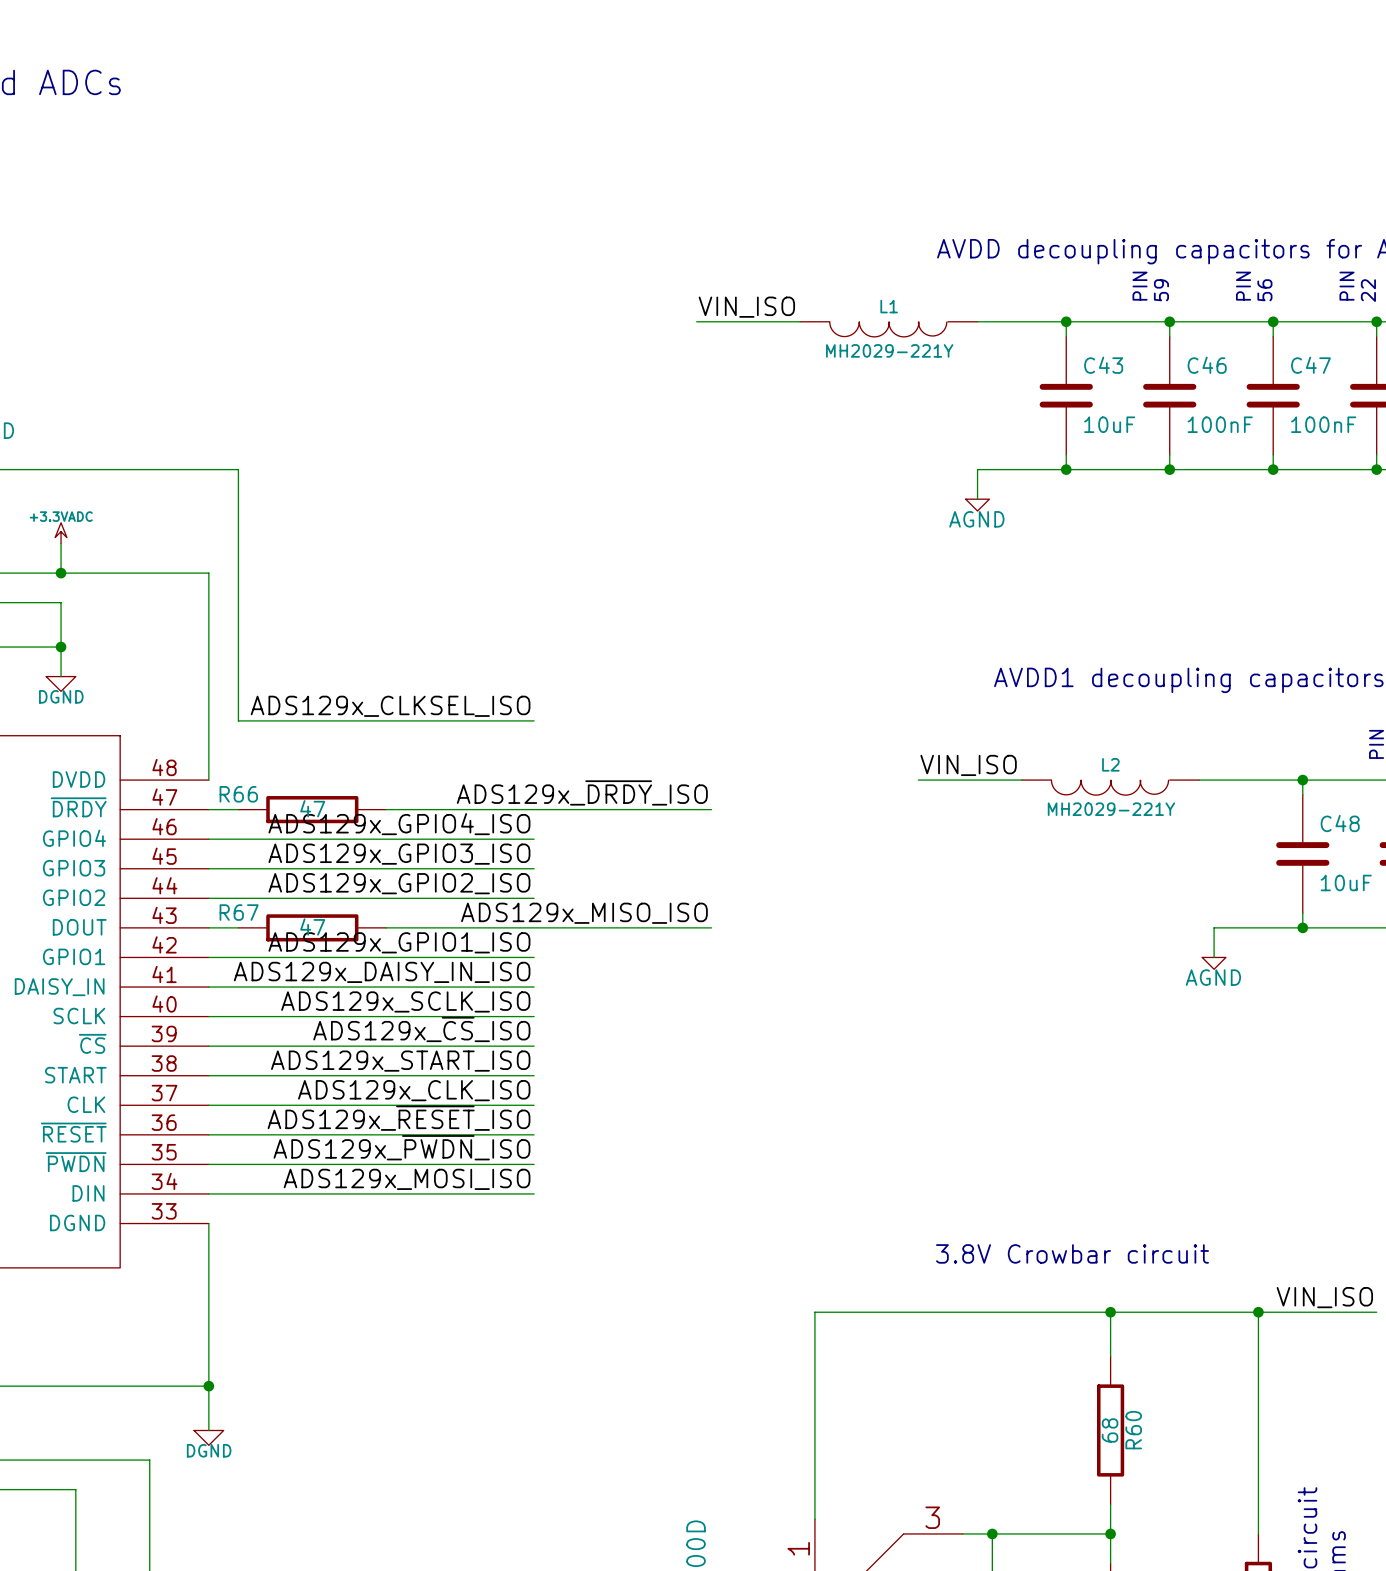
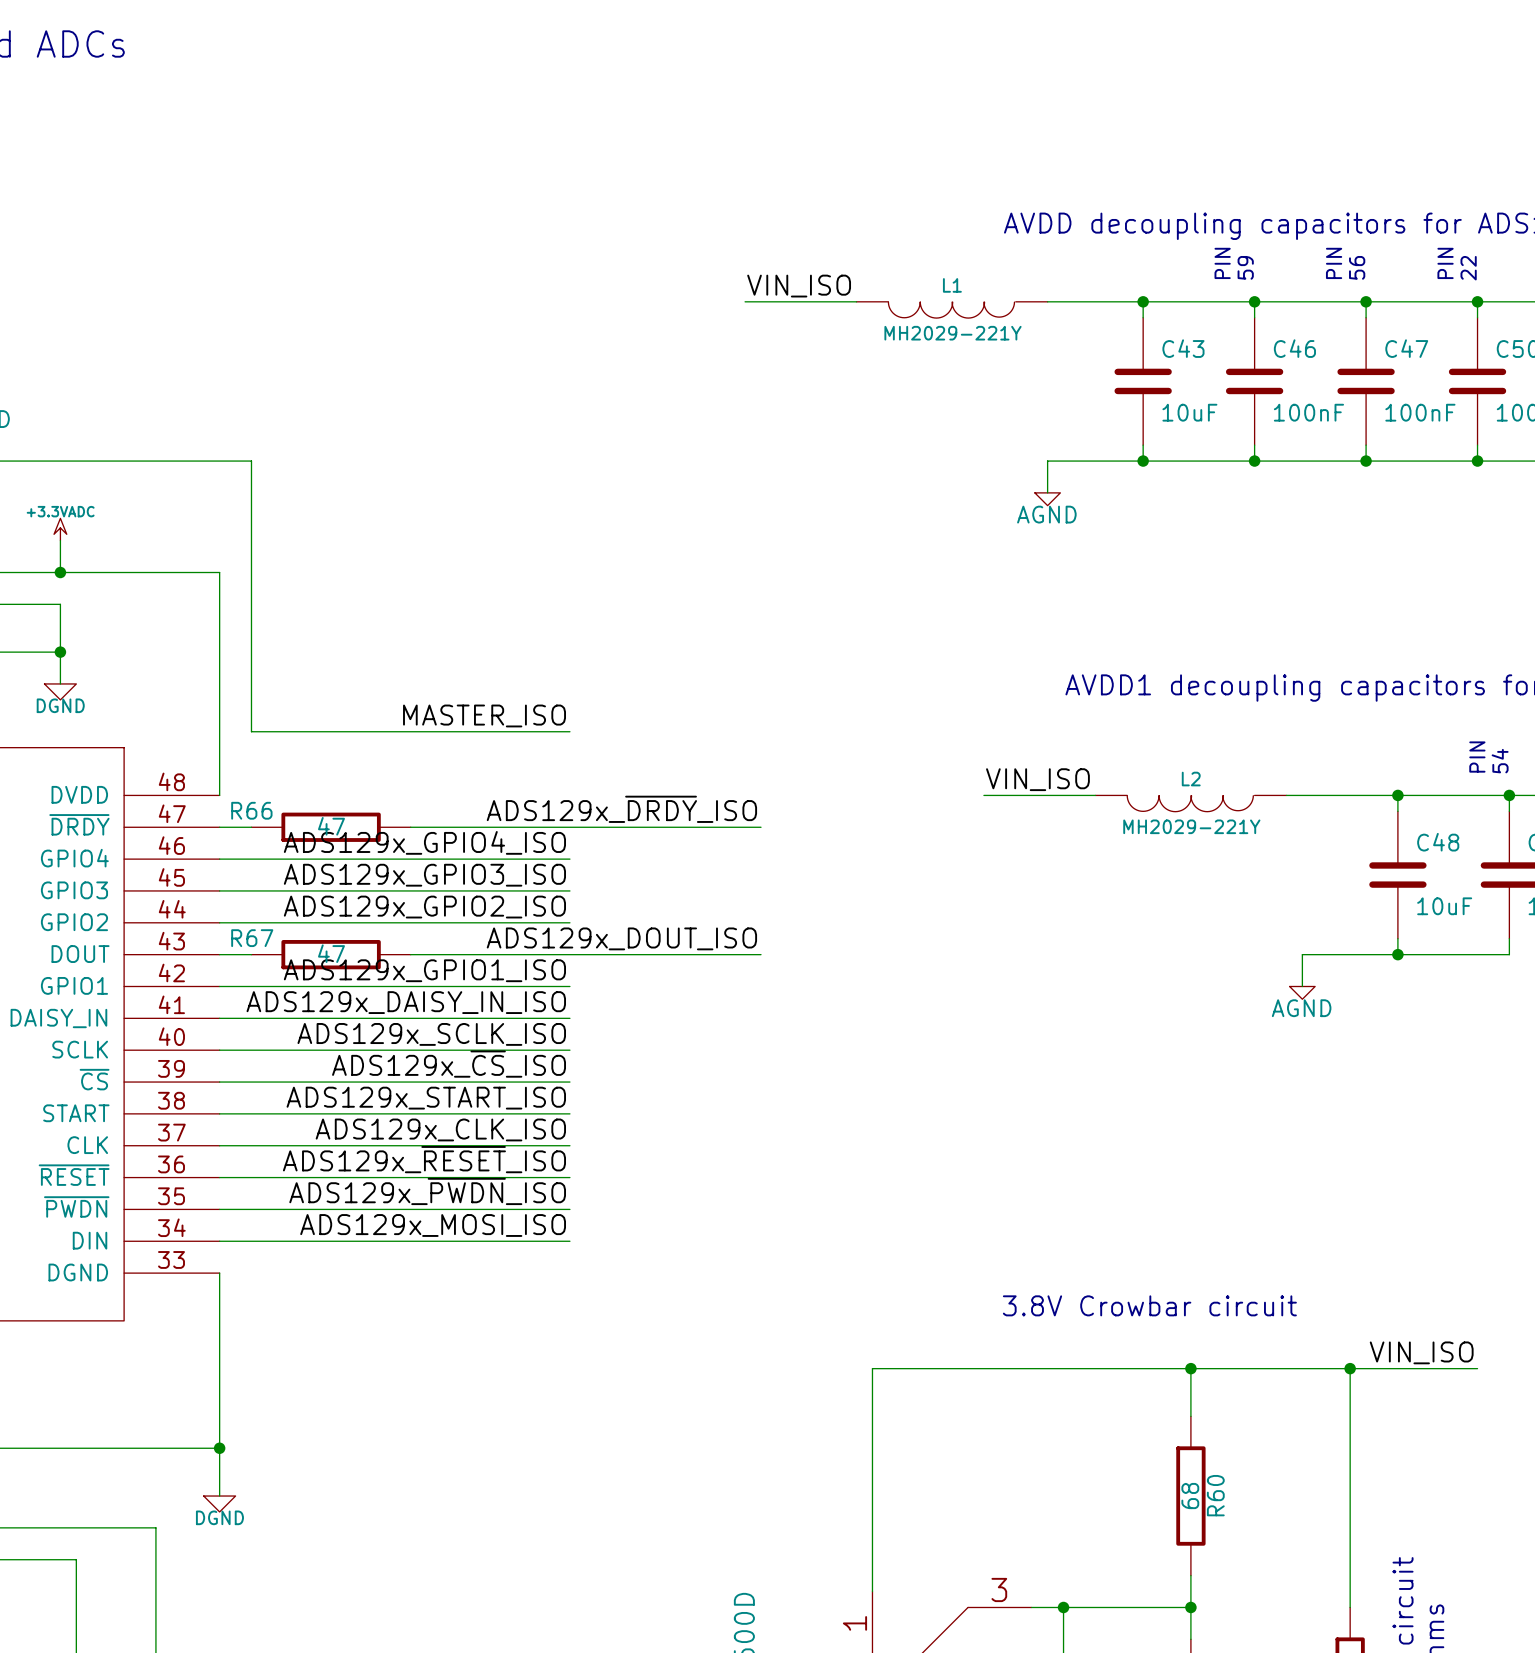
label: ADS129x_CLKSEL_ISO (390, 706) -> MASTER_ISO (484, 715)
label: ADS129x_MISO_ISO (584, 913) -> ADS129x_DOUT_ISO (621, 938)

